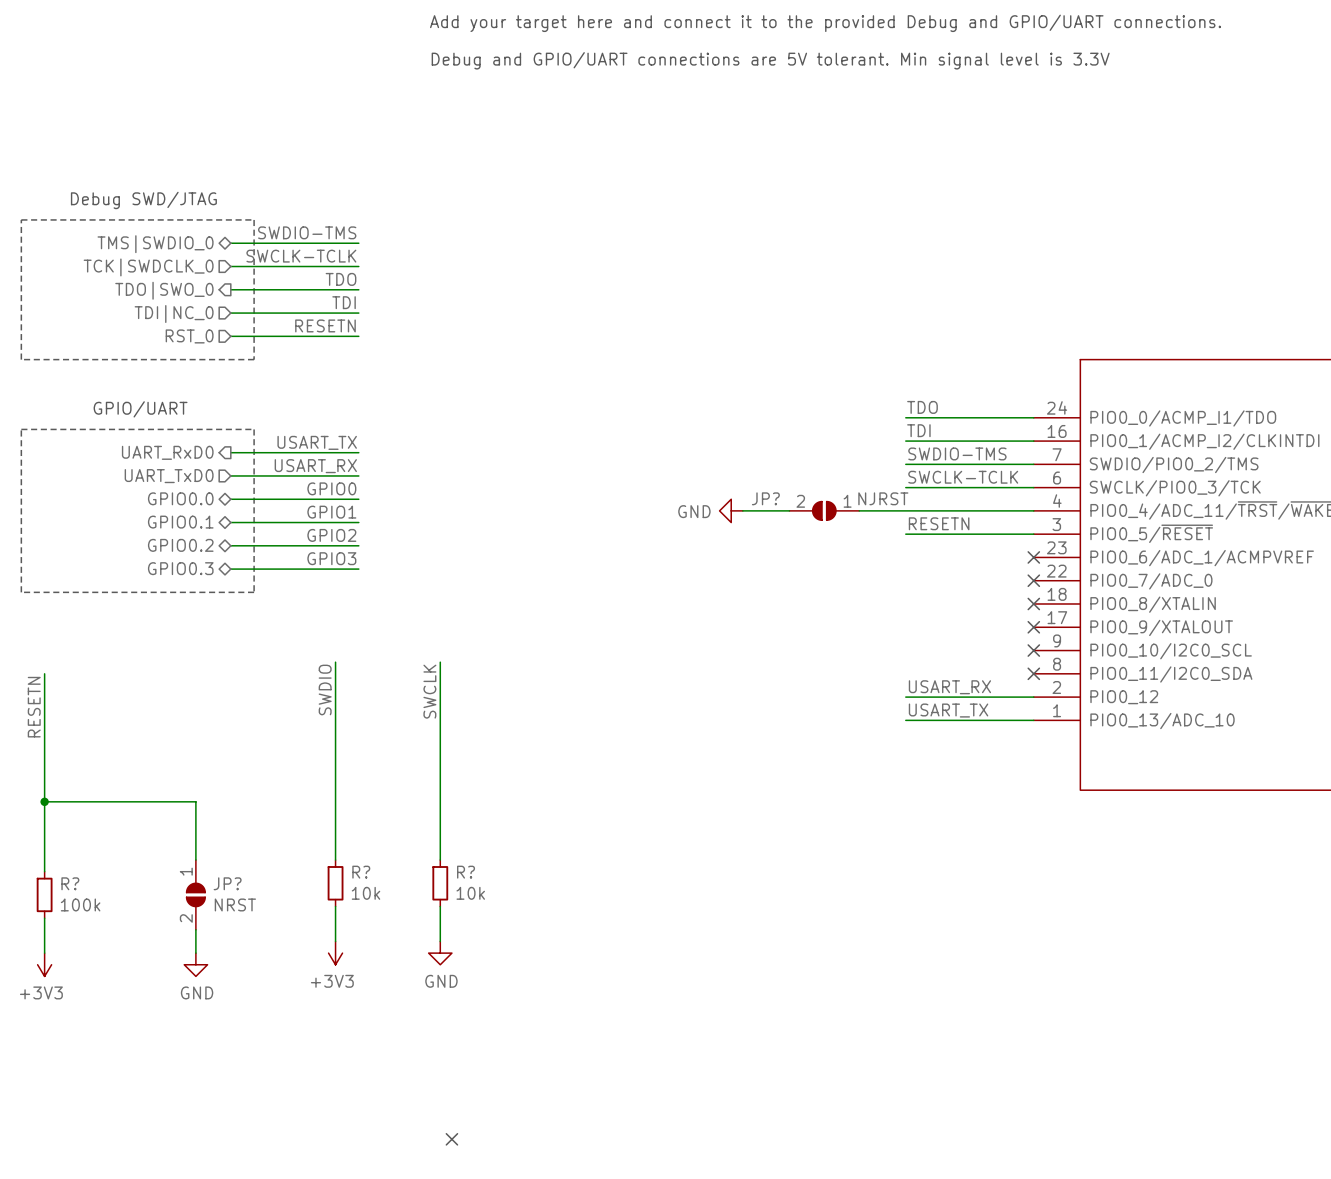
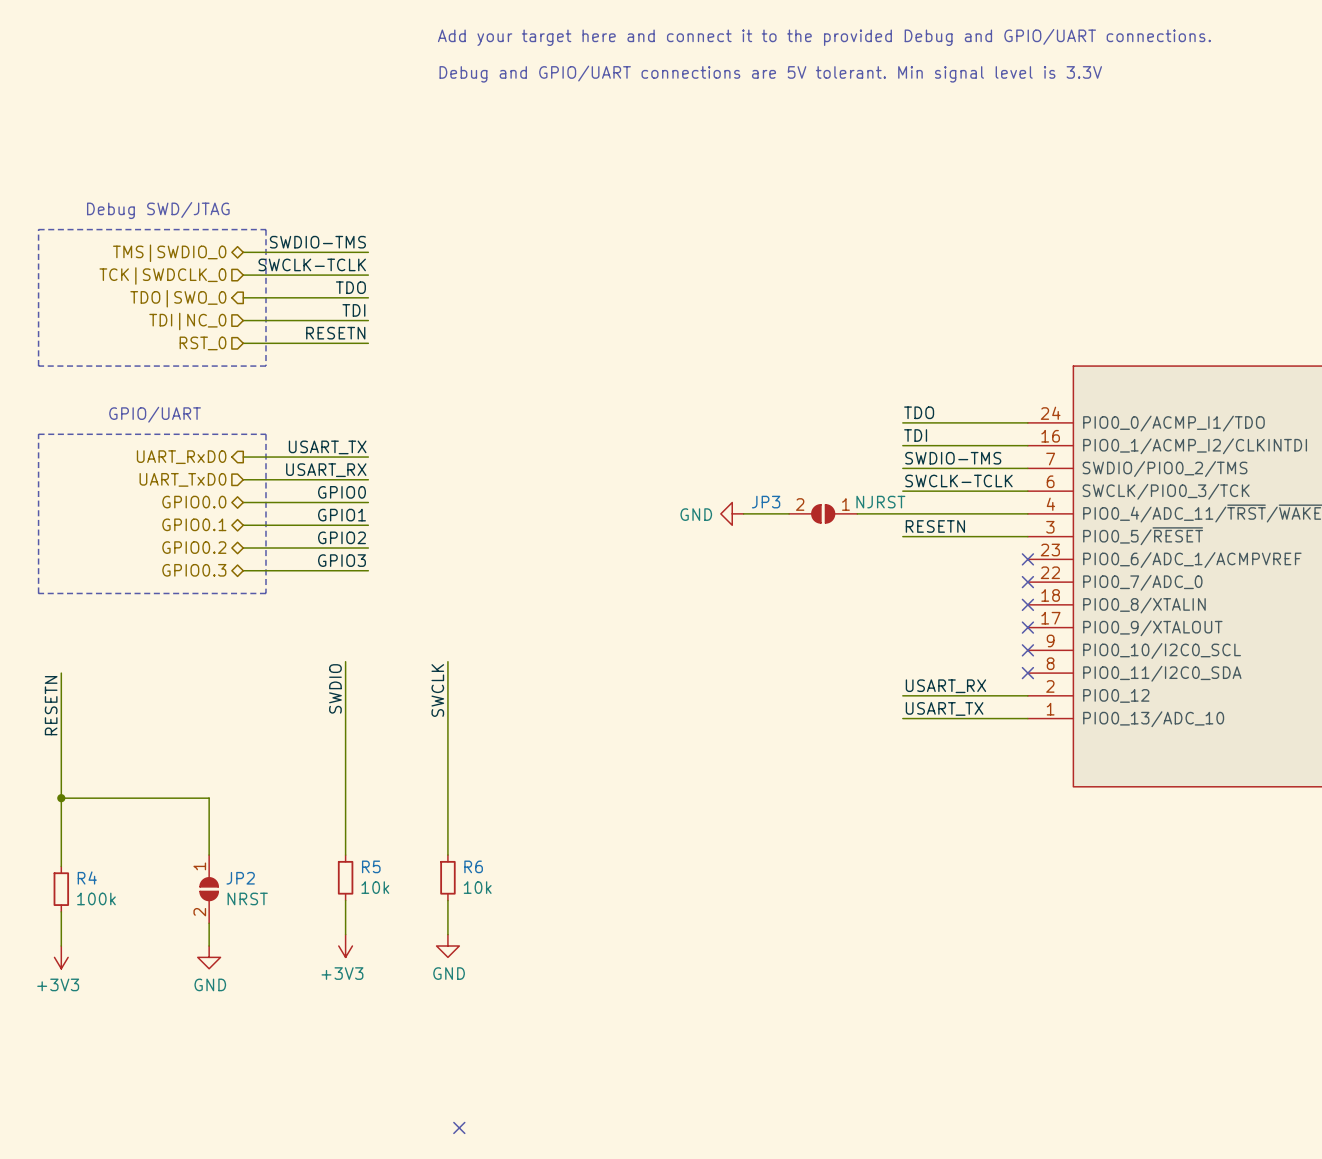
JP? name: JP? (765, 498) -> JP3 (766, 502)
R? name: R? (361, 872) -> R5 (371, 866)
R? name: R? (466, 872) -> R6 (473, 866)
R? name: R? (70, 883) -> R4 (87, 877)
JP? name: JP? (227, 883) -> JP2 (240, 878)

